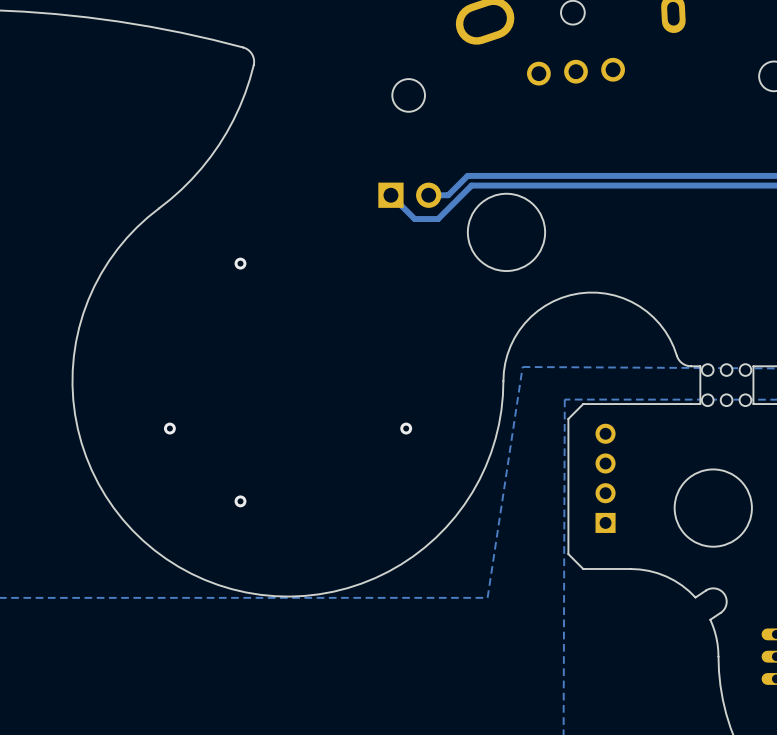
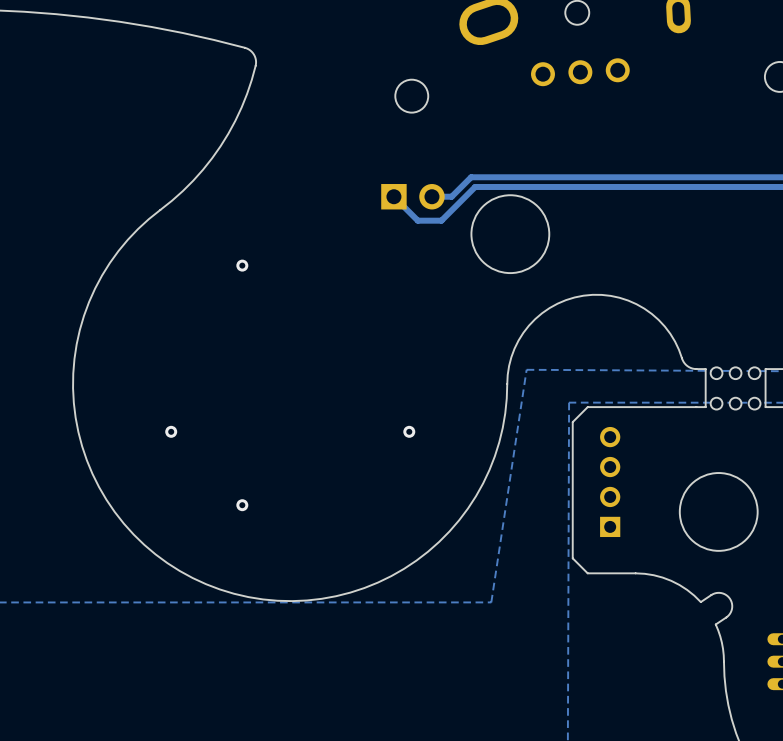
part footprint: [699, 364, 755, 407] -> [704, 367, 767, 410]
board edge: (759, 366) (753, 366) -> none
board edge: (759, 404) (753, 404) -> none

